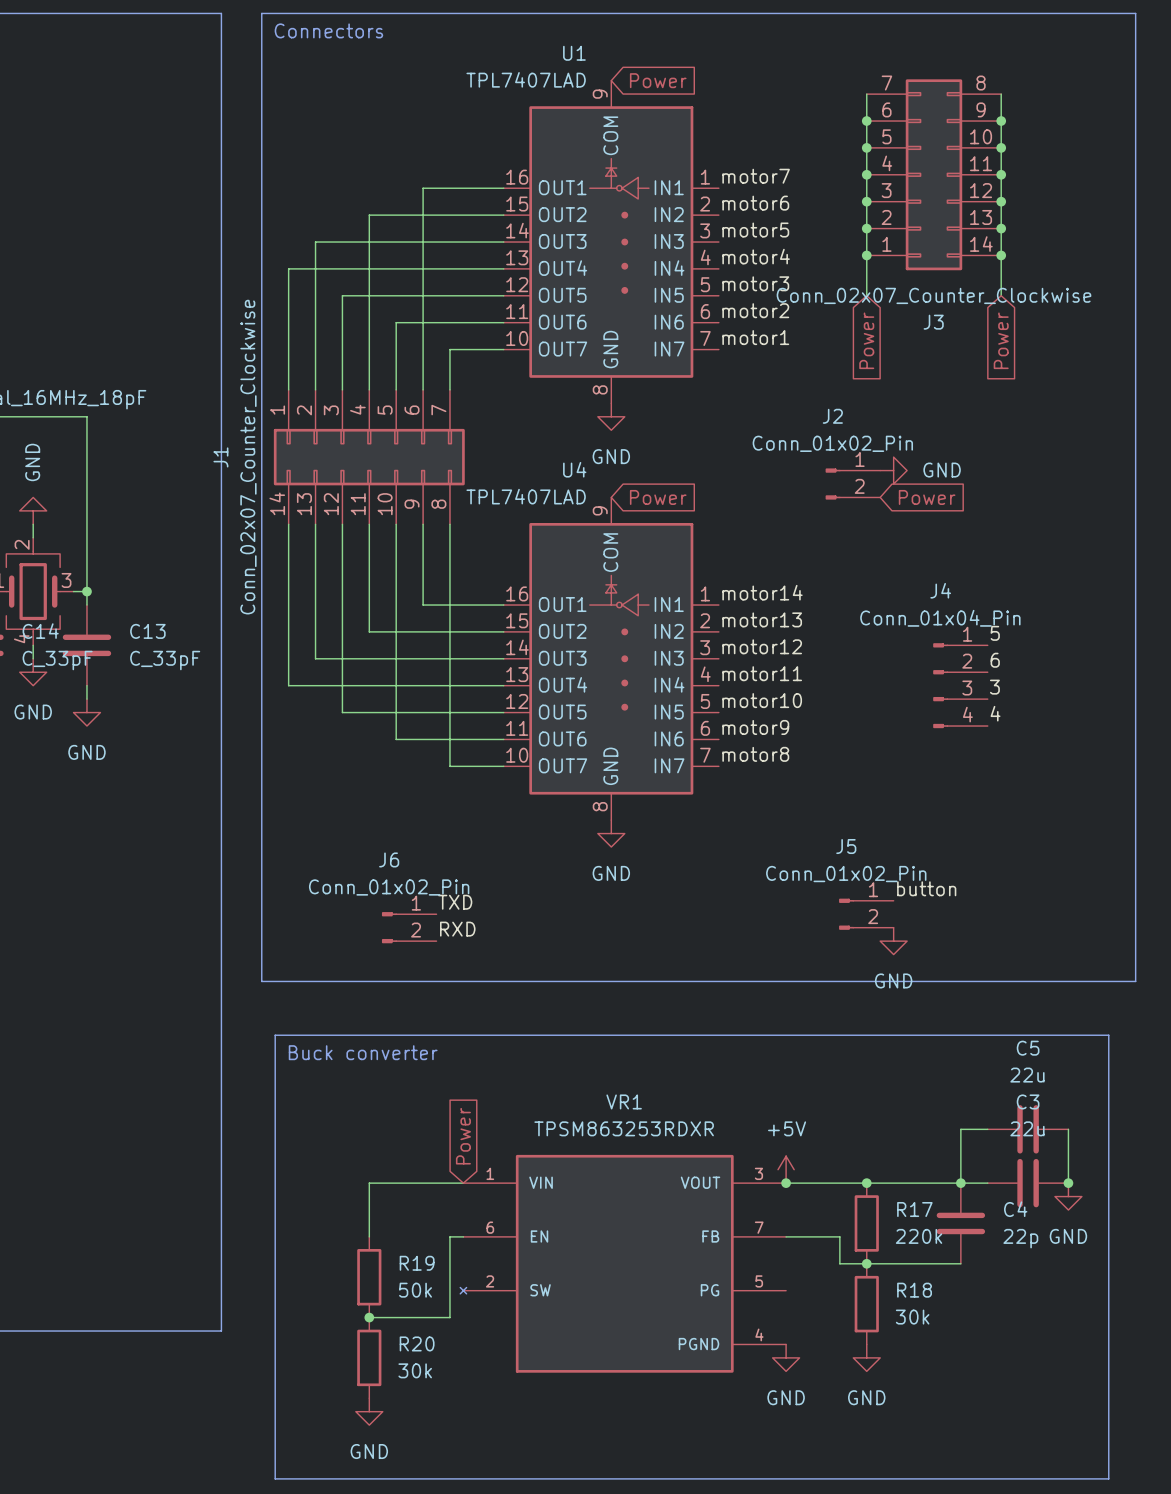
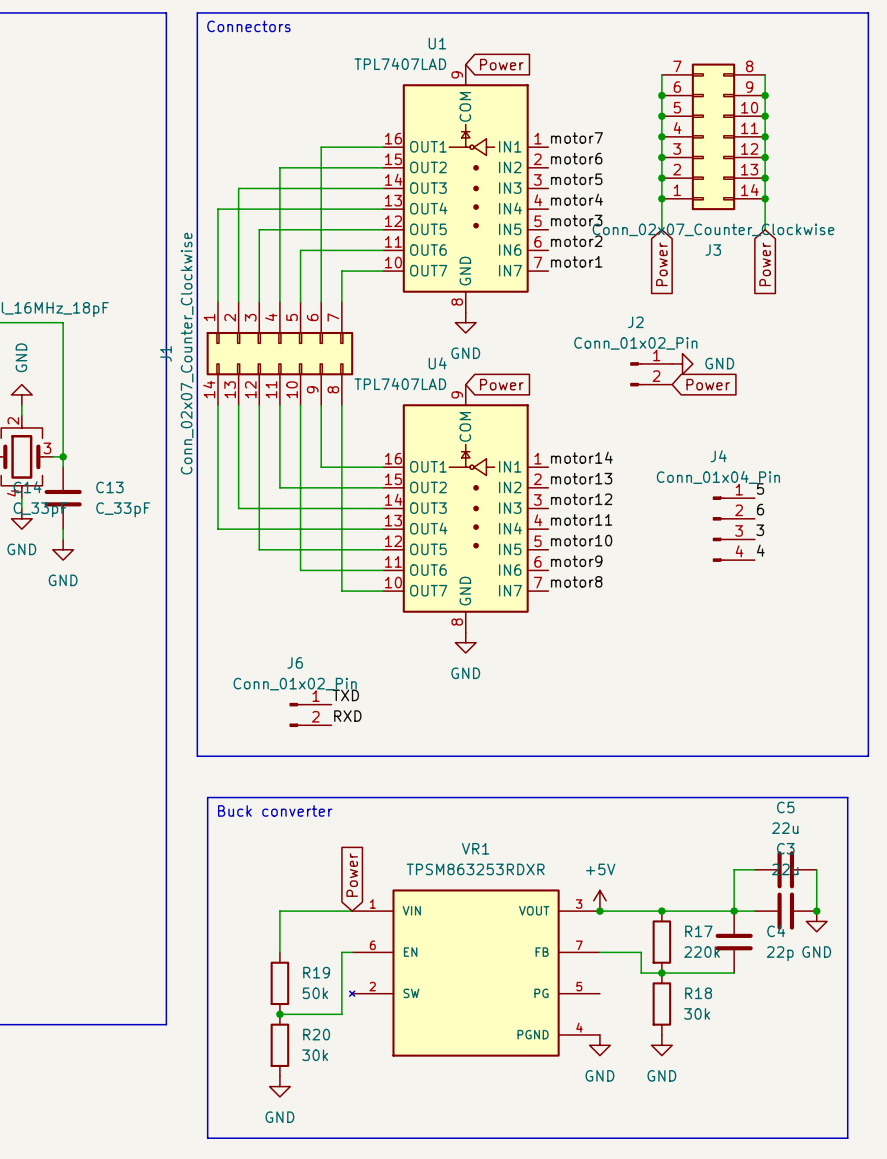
label: button (926, 888) -> none
J5: Conn_01x02_Pin (866, 914) -> none
power symbol: GND (893, 941) -> none

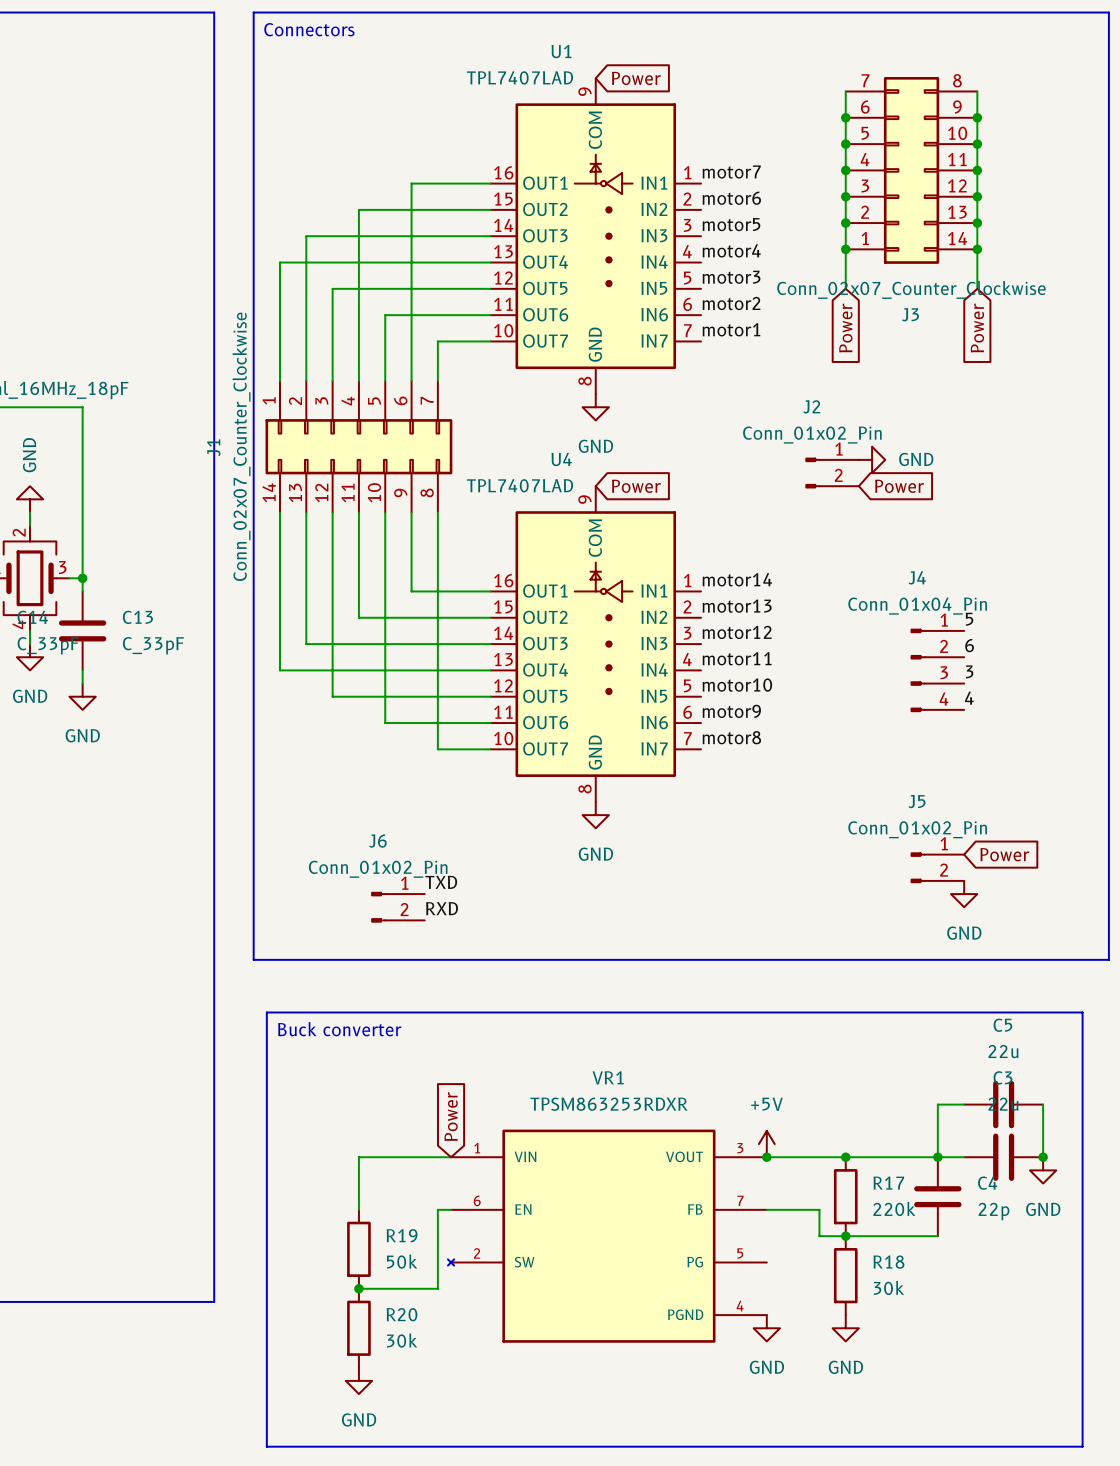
global label: none -> Power (1004, 854)
J5: none -> Conn_01x02_Pin (937, 867)
power symbol: none -> GND (964, 894)

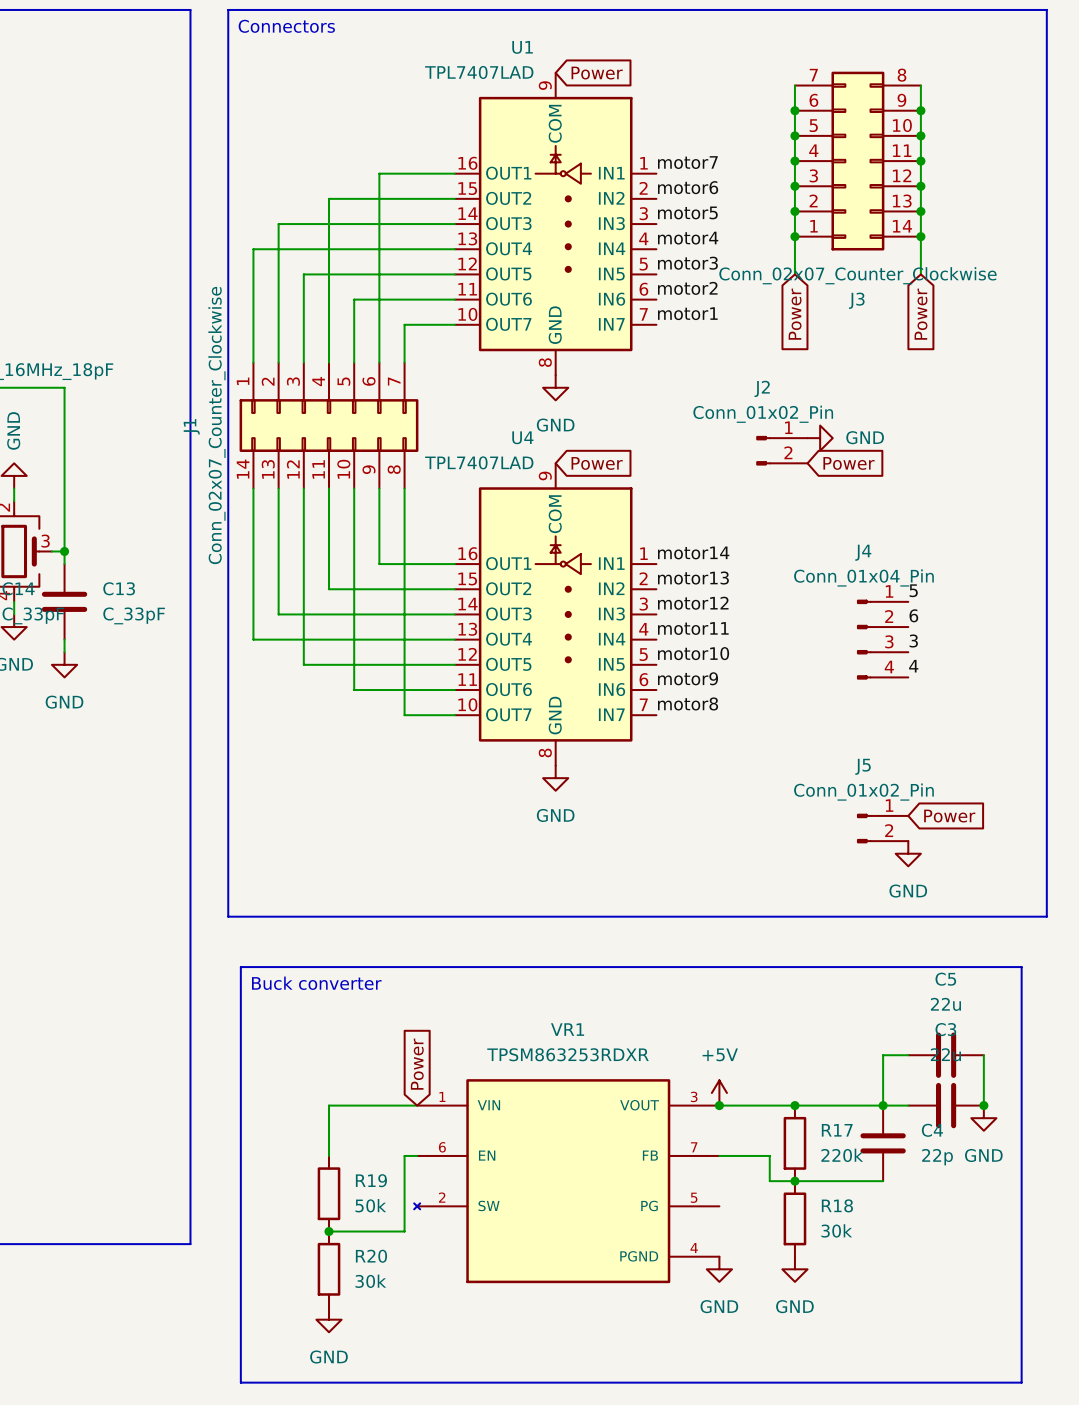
label: TXD (441, 882) -> none
J6: Conn_01x02_Pin (398, 907) -> none
label: RXD (442, 908) -> none

